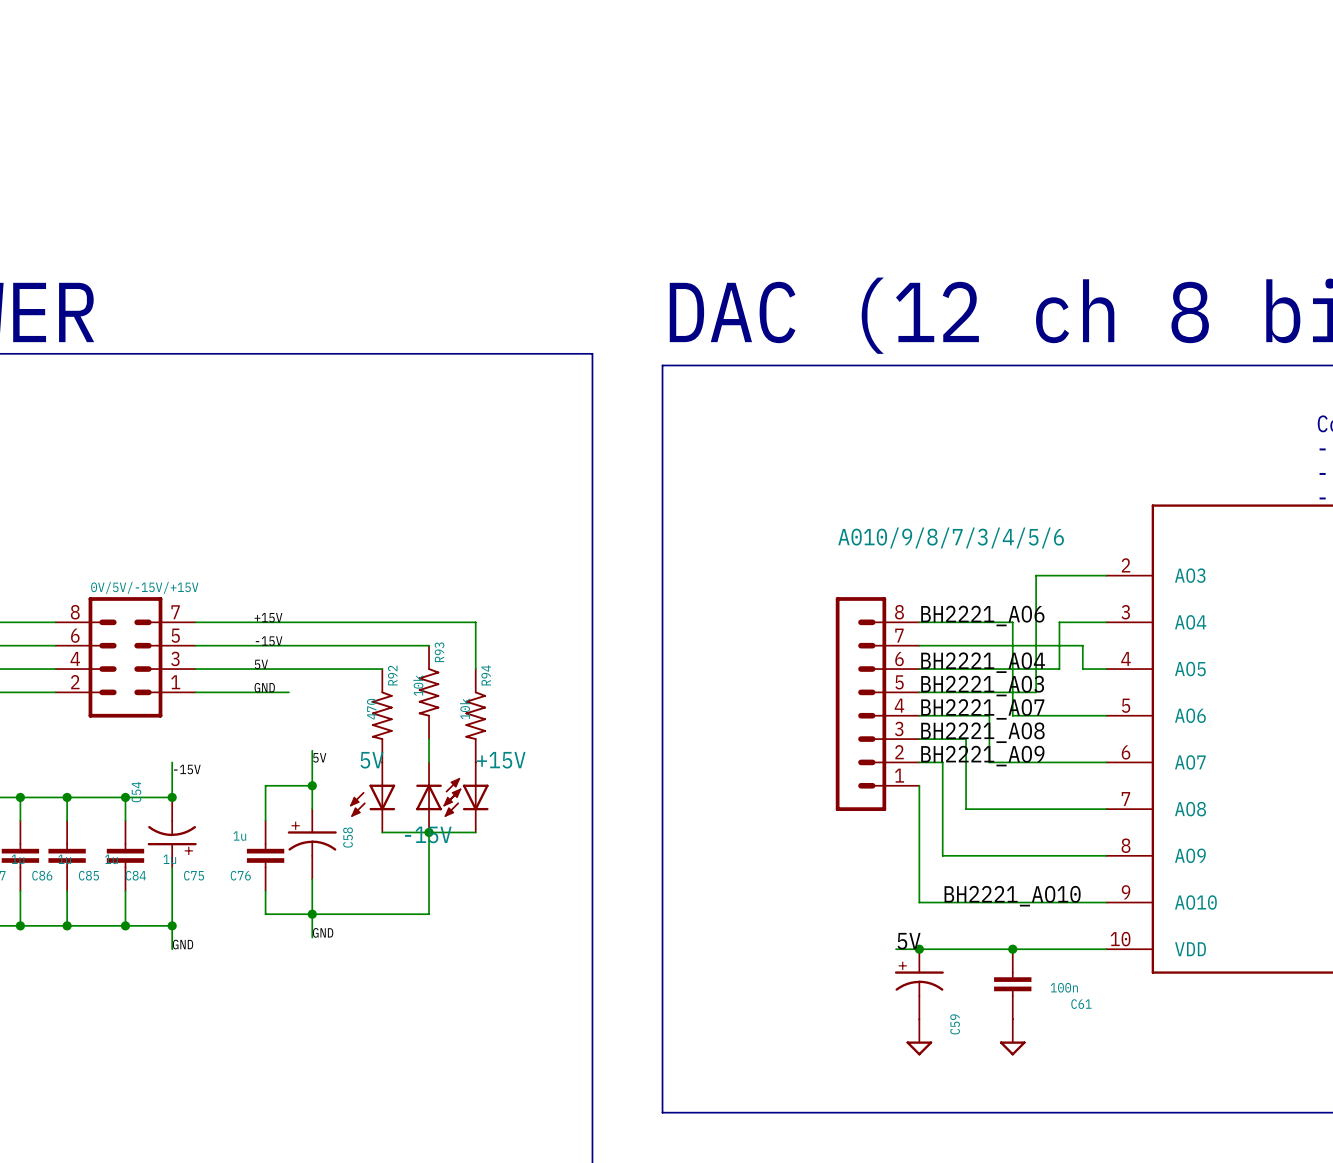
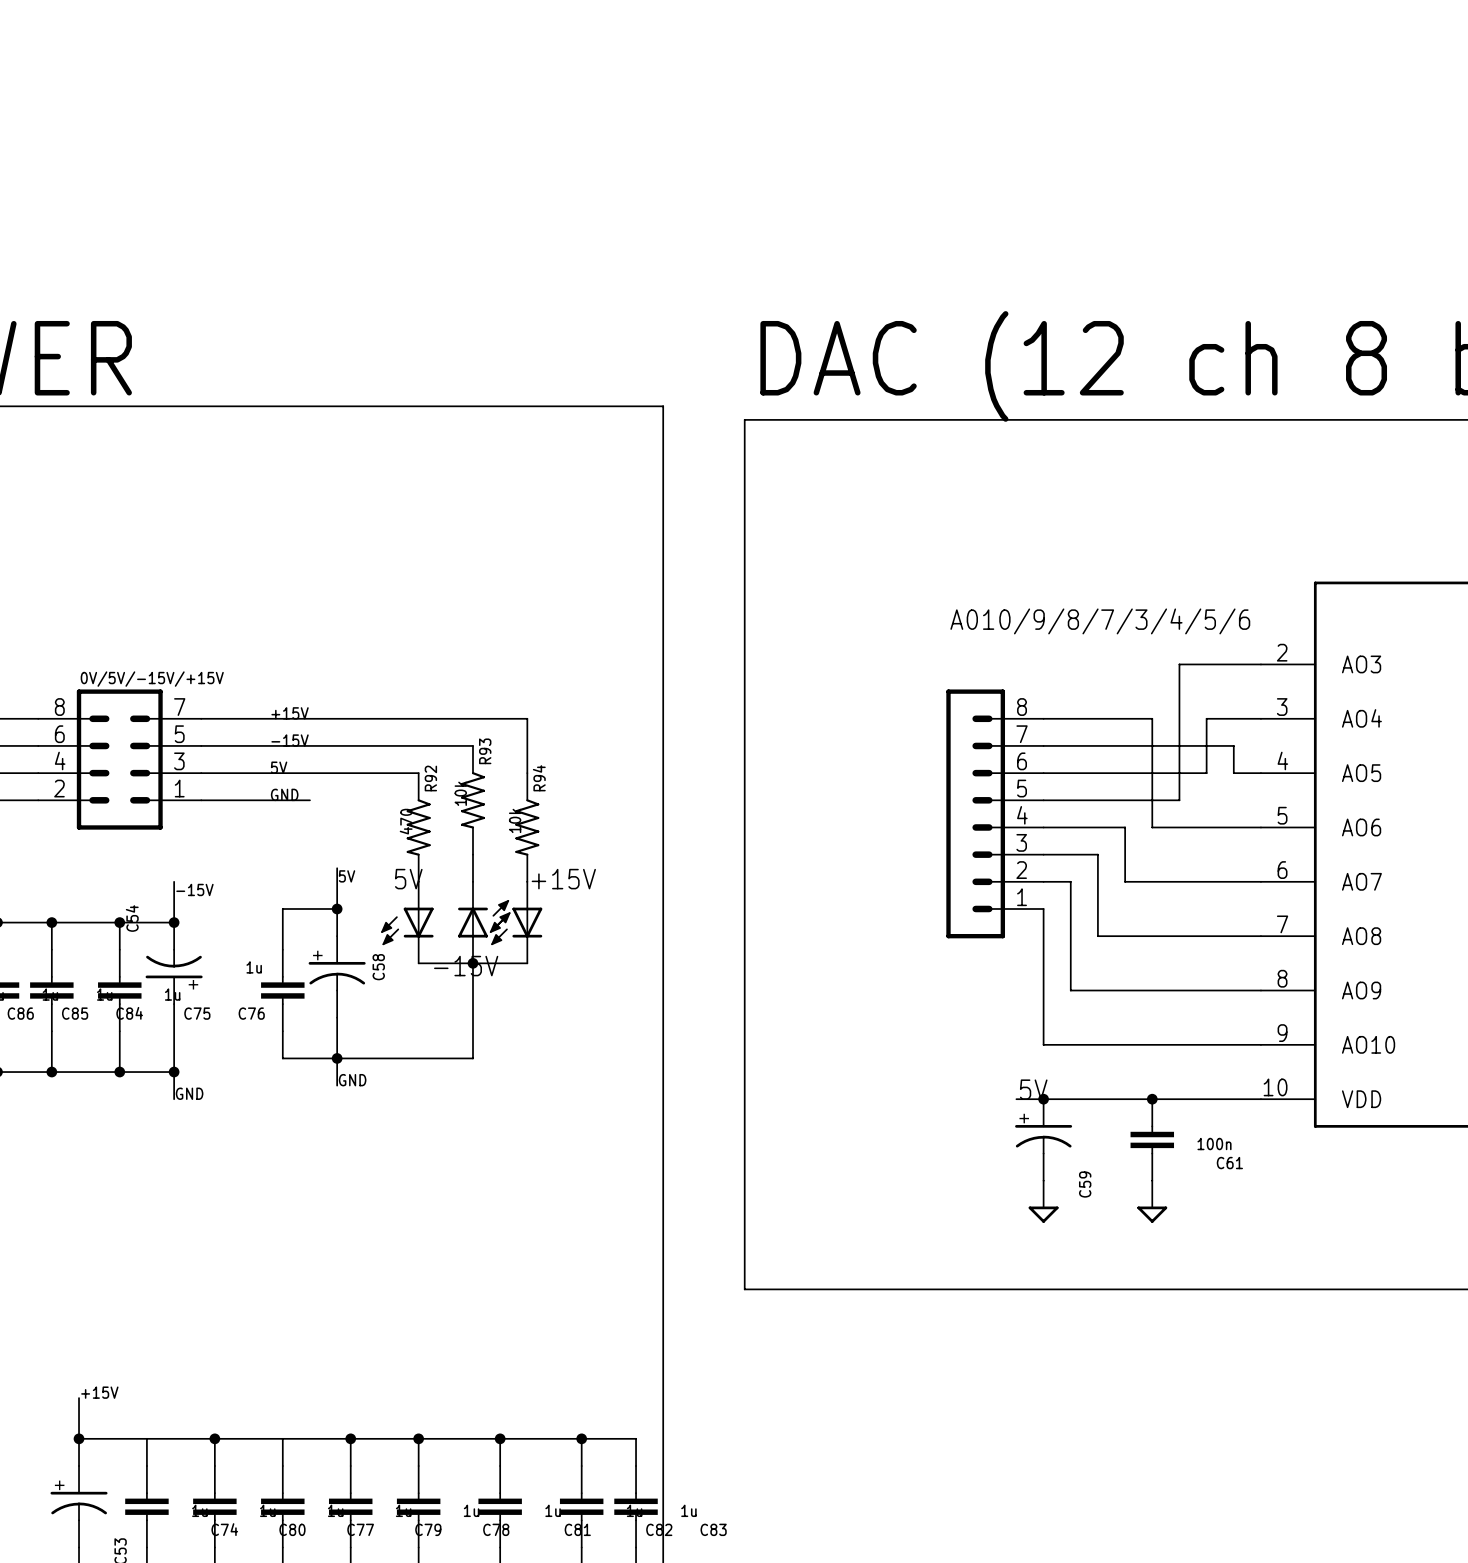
label: BH2221_AO6 (982, 616) -> none
label: BH2221_AO4 (983, 662) -> none
label: BH2221_AO3 (982, 686) -> none
label: BH2221_AO7 (982, 709) -> none
label: BH2221_AO8 (982, 732) -> none
label: BH2221_AO9 (982, 756) -> none
label: BH2221_AO10 (1012, 896) -> none

